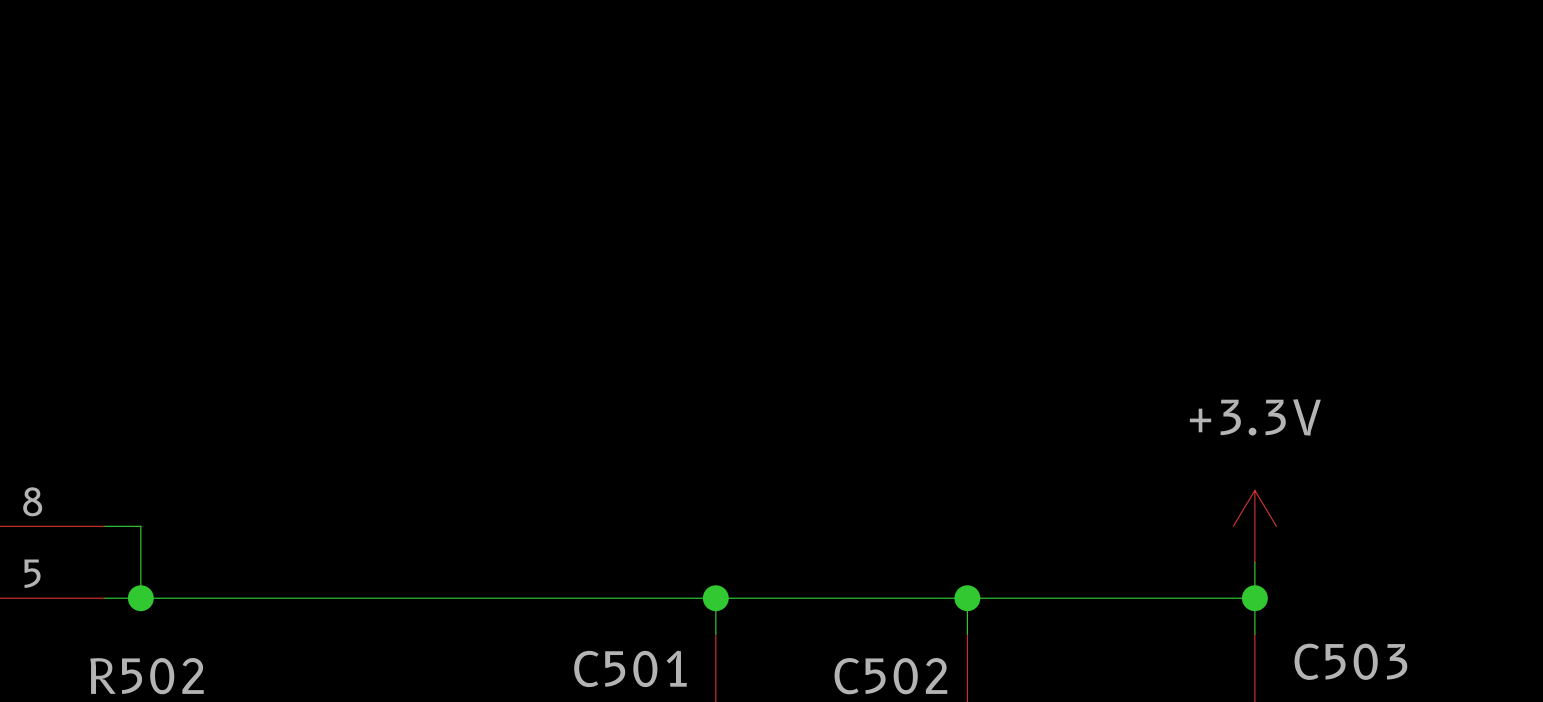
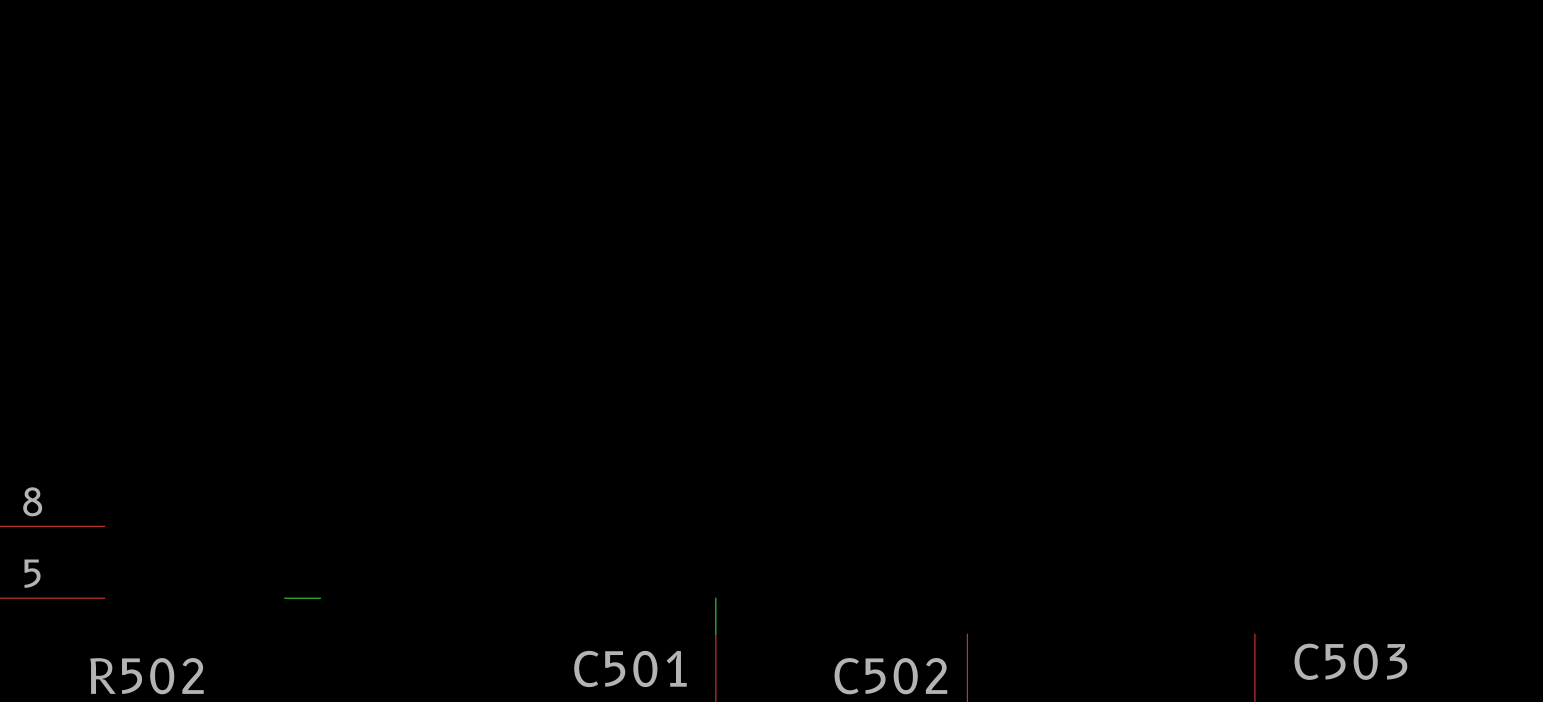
wire: (104, 526) (140, 526) (140, 598) -> none
power symbol: +3.3V (1254, 526) -> none
wire: (1254, 562) (1254, 634) -> none
wire: (104, 598) (284, 598) -> none
junction: (140, 598) -> none
wire: (320, 598) (1254, 598) -> none
junction: (715, 598) -> none
wire: (967, 598) (967, 634) -> none
junction: (967, 598) -> none
junction: (1254, 598) -> none

